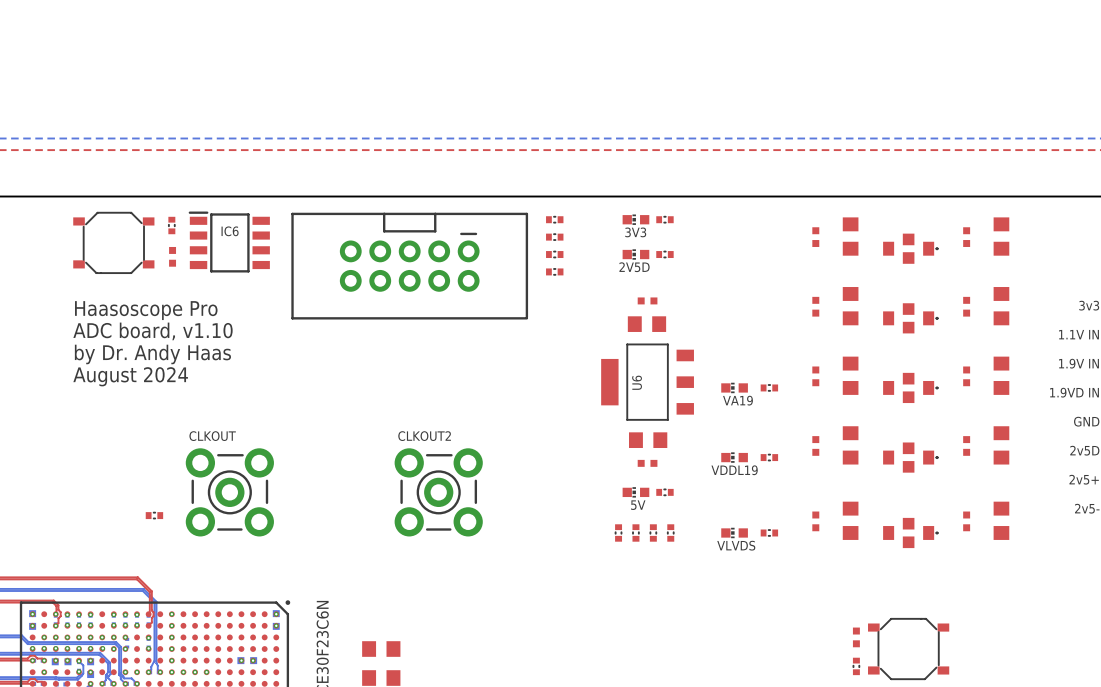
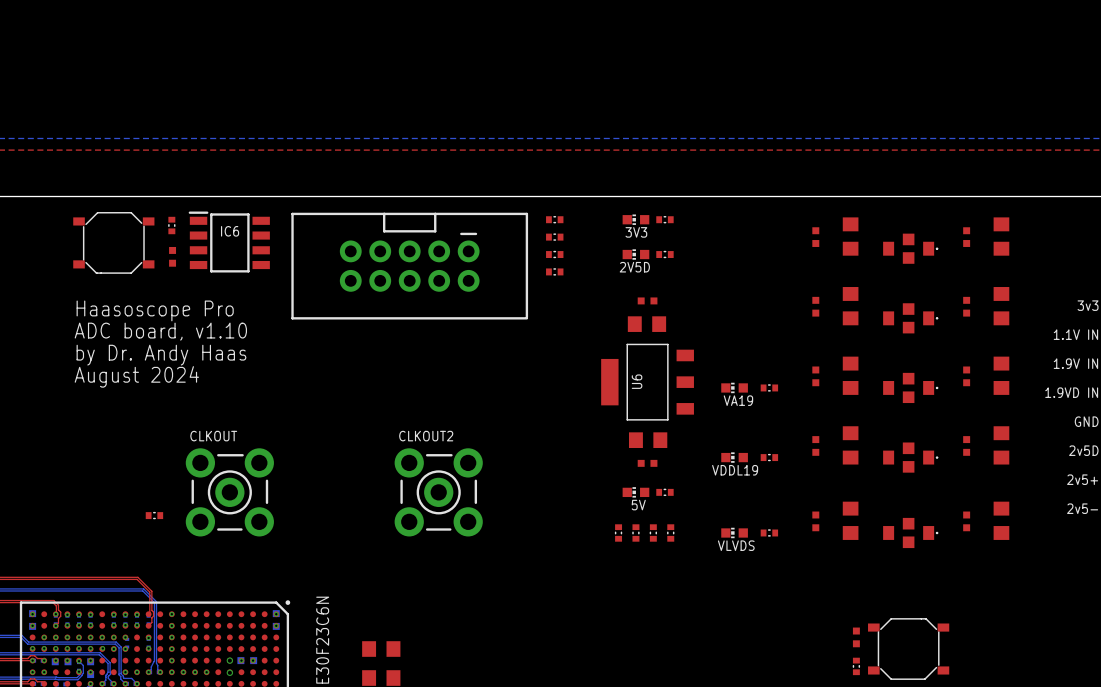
via: none -> (229, 660)
via: none -> (32, 672)
via: none -> (229, 672)

